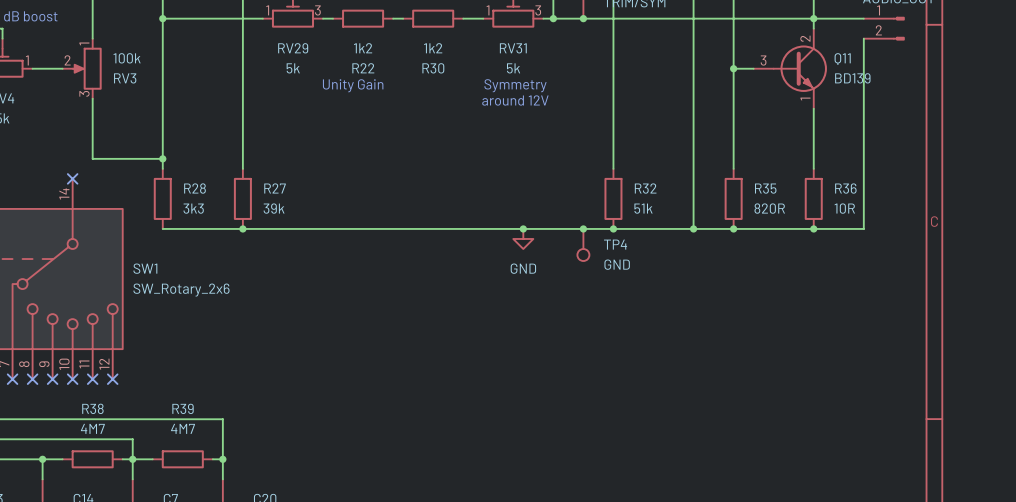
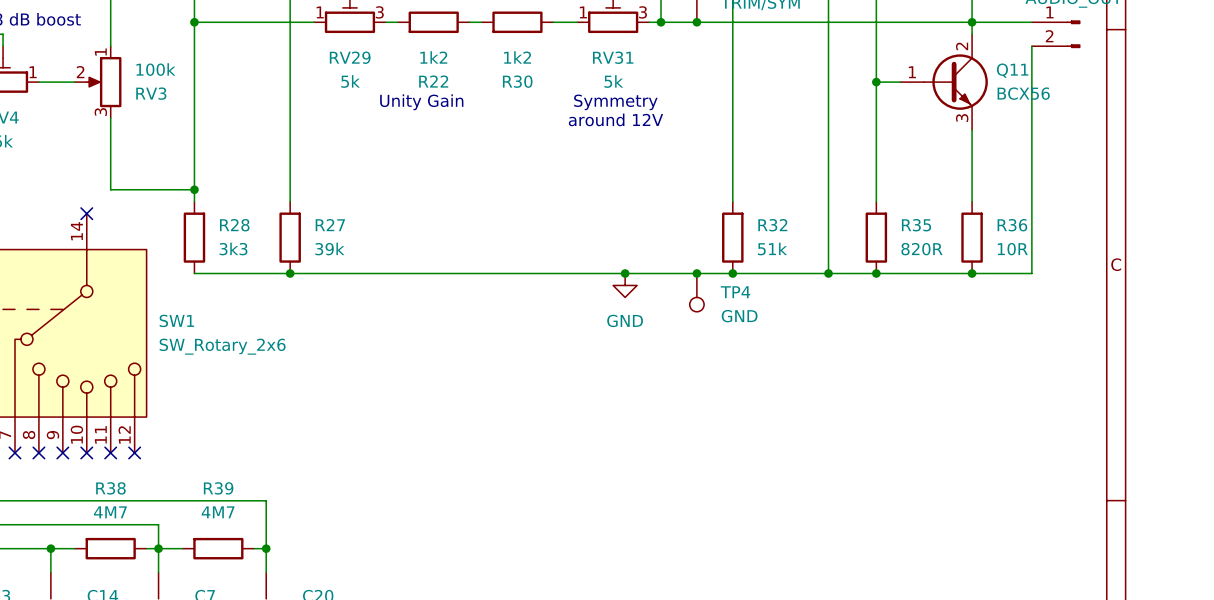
Q11 pin number: 3 (763, 60) -> 1 (912, 72)
Q11 value: BD139 (852, 78) -> BCX56 (1023, 93)
Q11 pin number: 1 (805, 99) -> 3 (962, 118)

